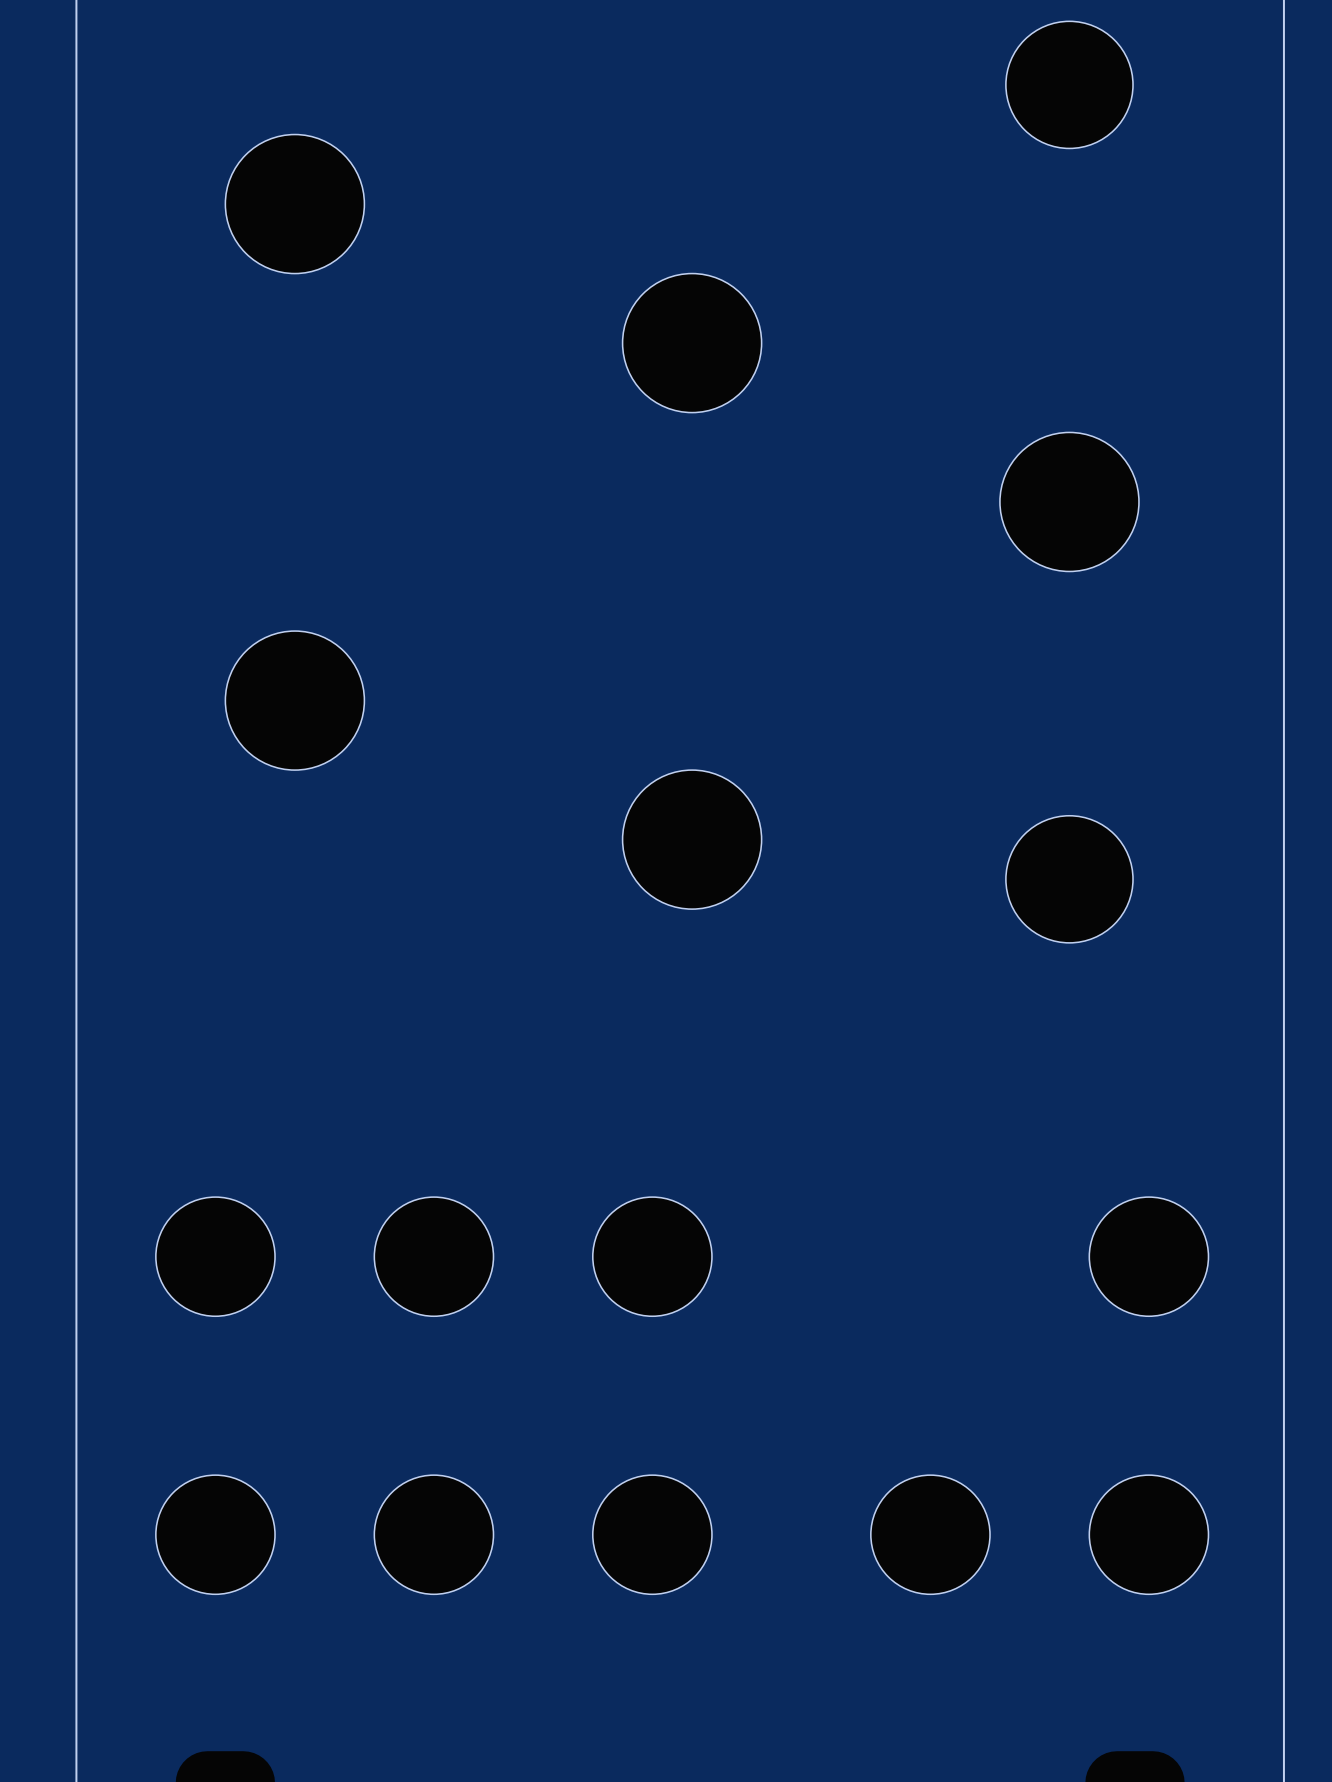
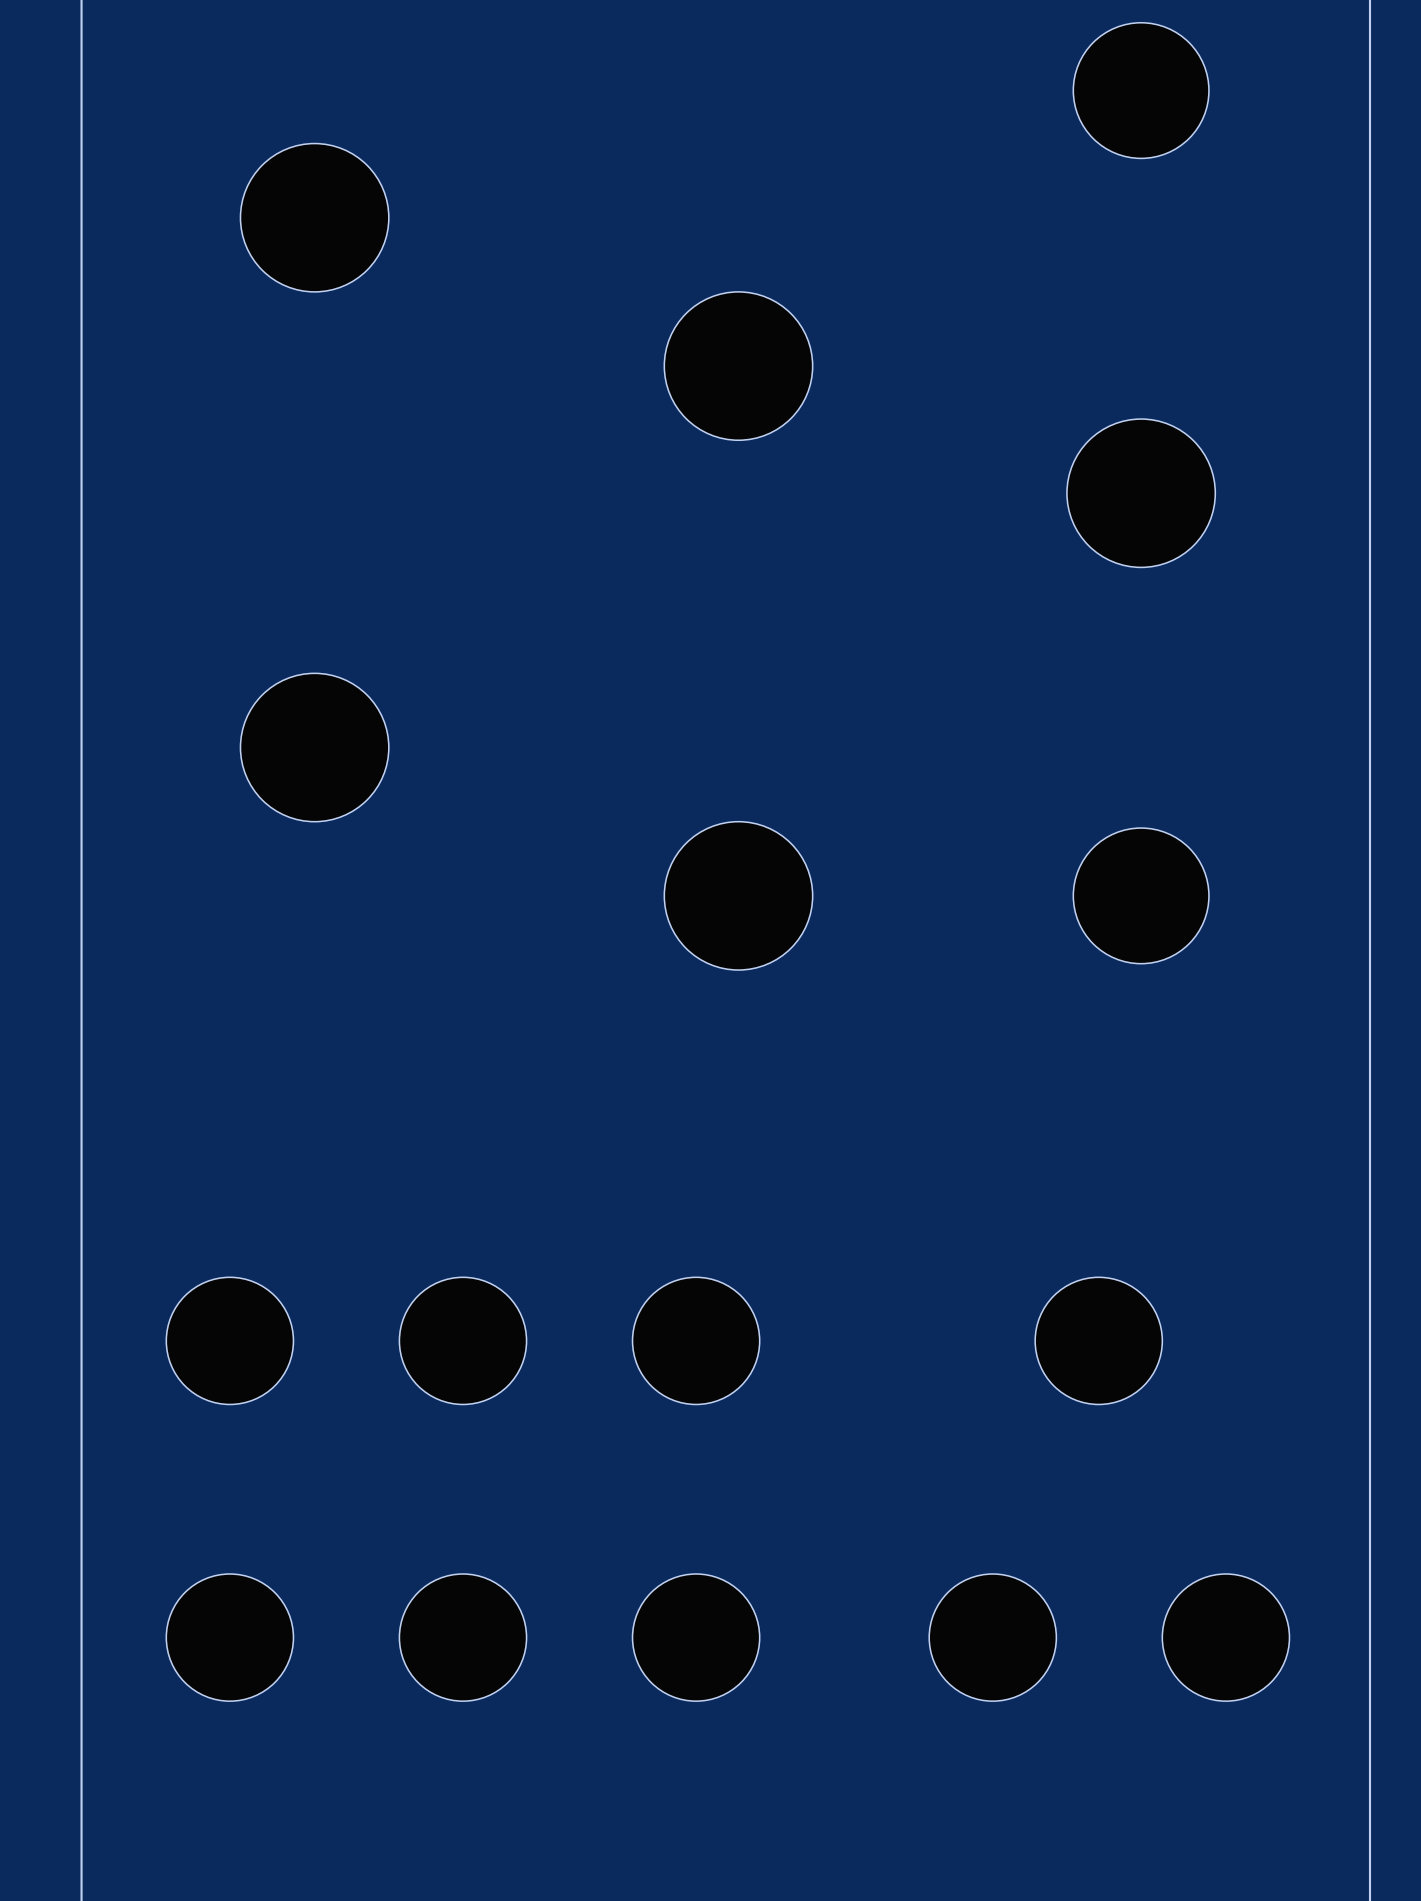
part position: (1069, 501) -> (1141, 493)
part position: (1069, 879) -> (1141, 895)
part position: (1148, 1256) -> (1098, 1340)

